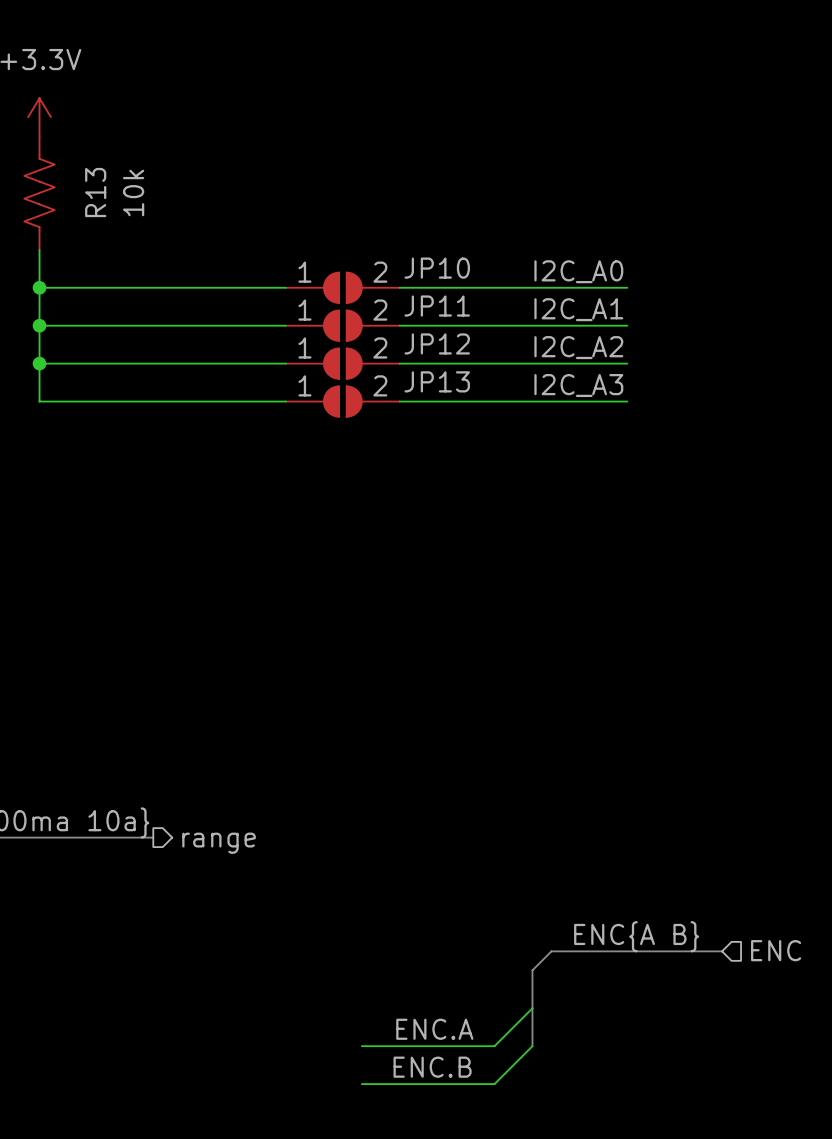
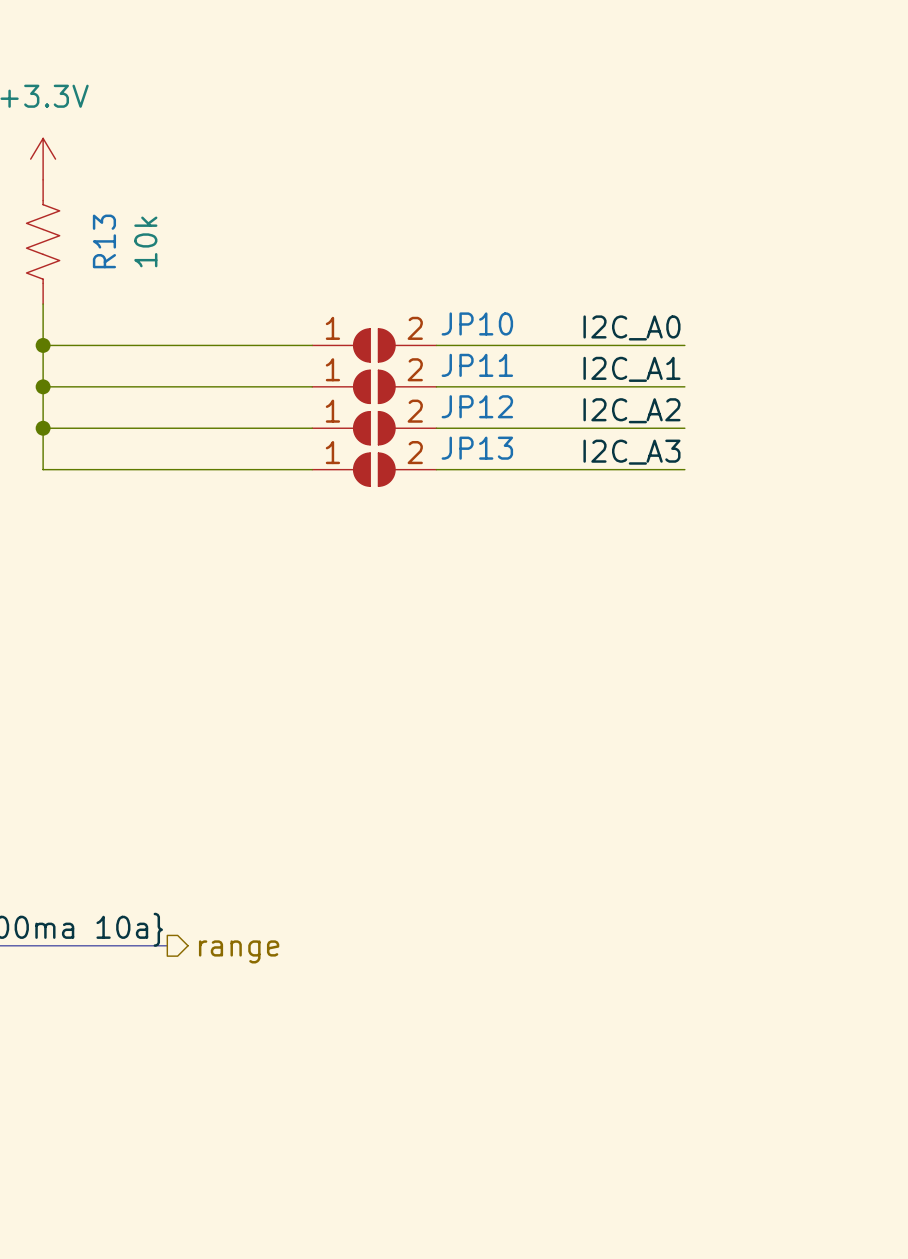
label: ENC{A B} (636, 936) -> none
hierarchical label: ENC (776, 950) -> none
bus: (722, 951) (551, 951) (532, 970) (532, 1046) -> none
wire: (532, 1008) (494, 1046) (361, 1046) -> none
label: ENC.A (434, 1029) -> none
wire: (532, 1046) (494, 1084) (361, 1084) -> none
label: ENC.B (432, 1067) -> none

